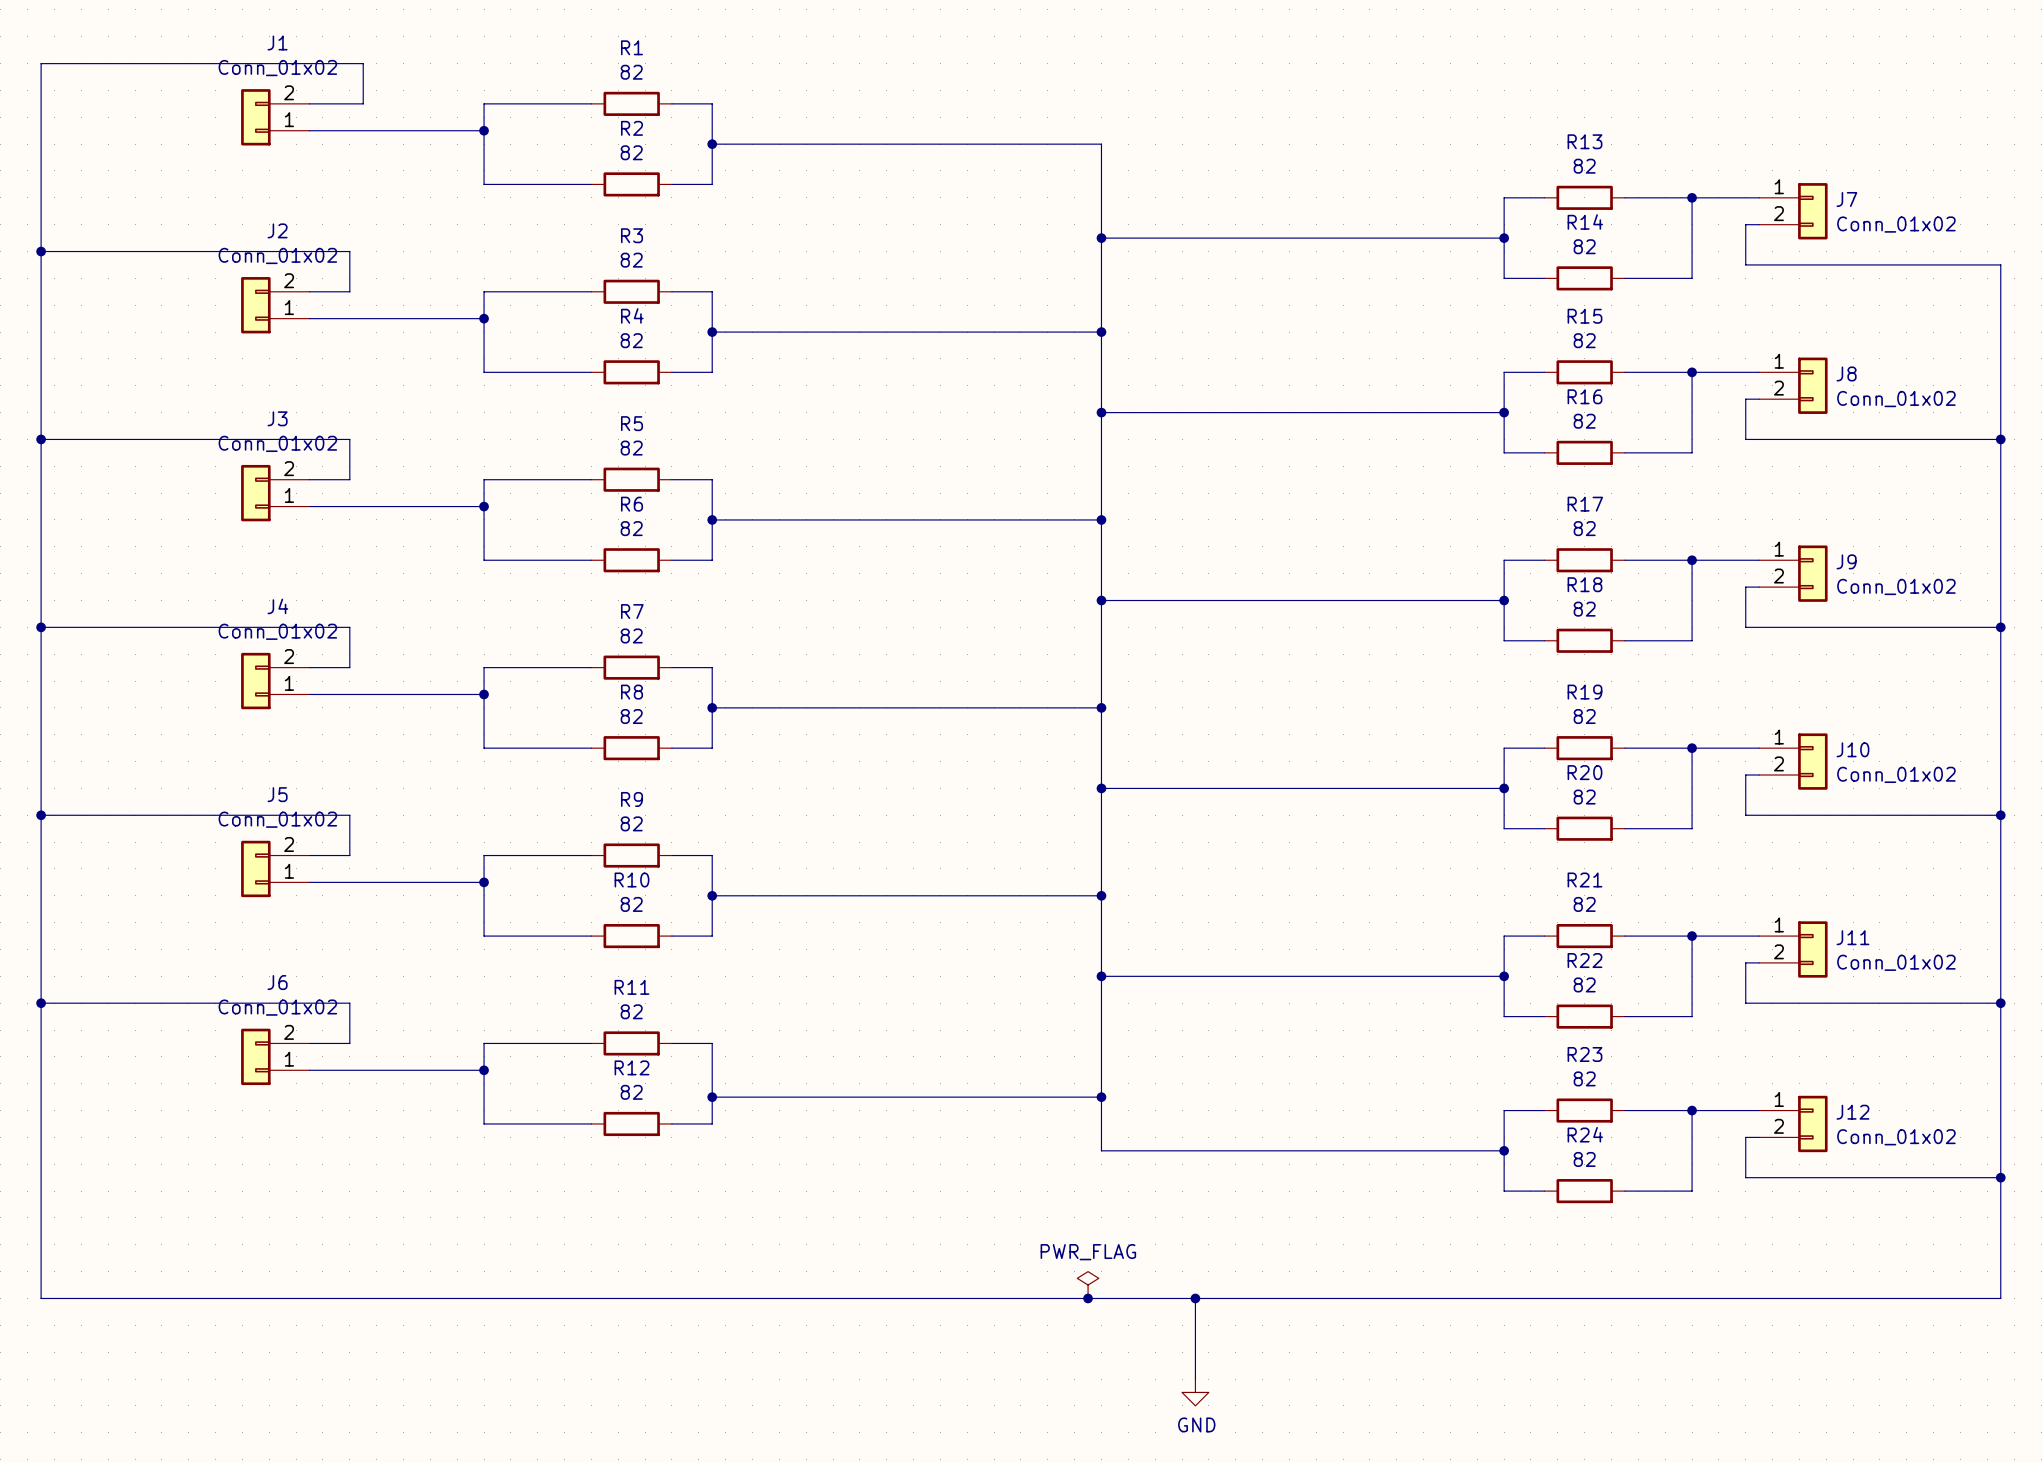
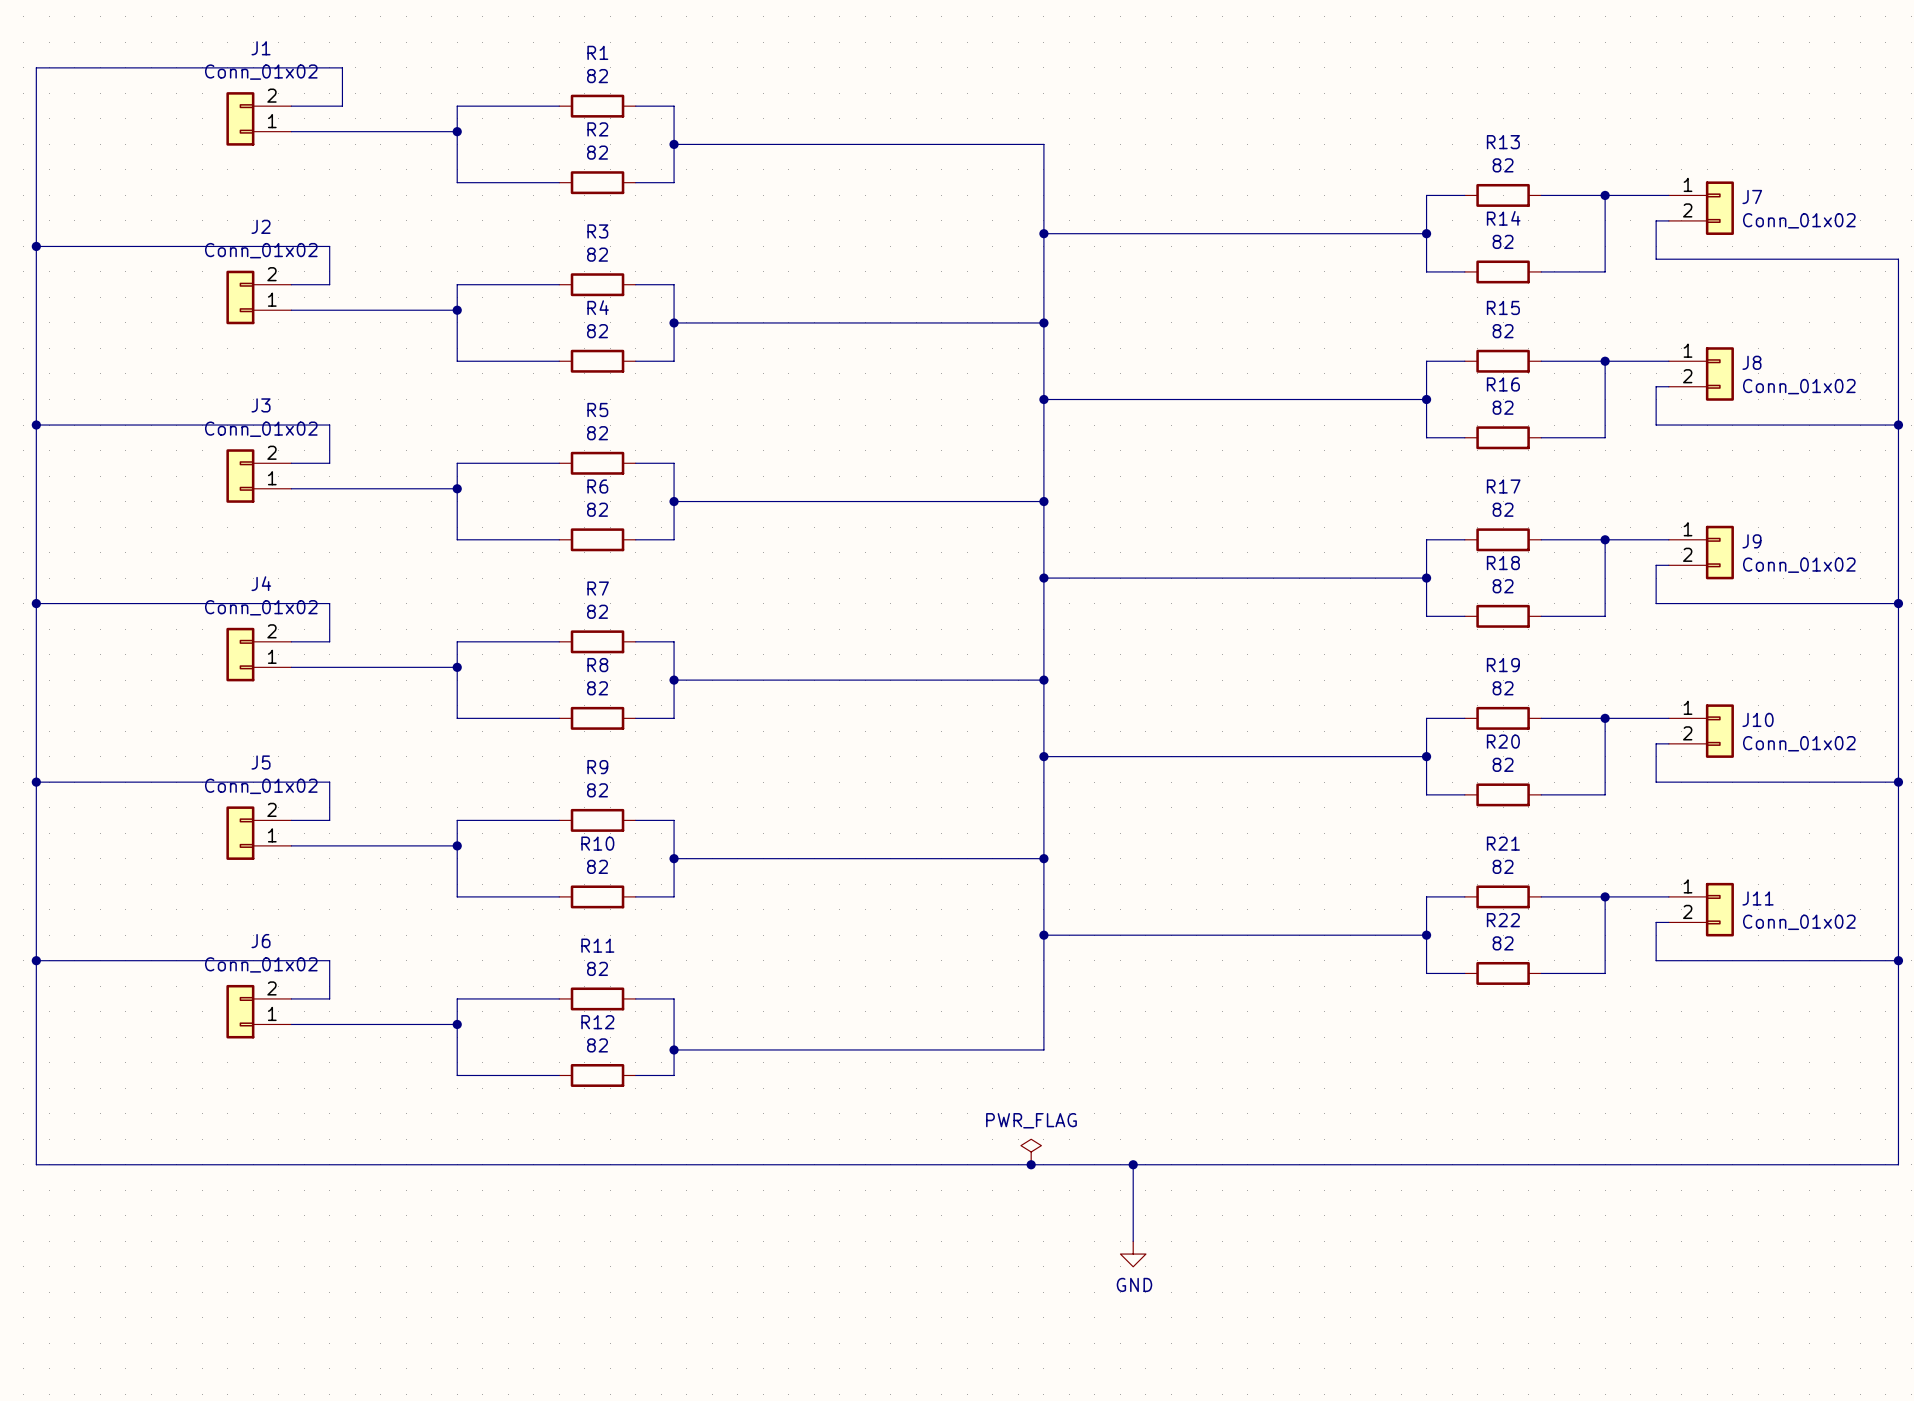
wire: (1101, 1097) (1101, 1150) (1504, 1150) -> none
junction: (1101, 1097) -> none
wire: (1544, 1110) (1504, 1110) (1504, 1191) (1544, 1191) -> none
R23: 82 (1584, 1110) -> none
wire: (1624, 1110) (1759, 1110) -> none
wire: (1692, 1110) (1692, 1191) (1624, 1191) -> none
junction: (1692, 1110) -> none
J12: Conn_01x02 (1793, 1123) -> none
wire: (1759, 1137) (1745, 1137) (1745, 1177) (2000, 1177) -> none
junction: (1504, 1150) -> none
junction: (2000, 1177) -> none
R24: 82 (1584, 1191) -> none
wire: (41, 1217) (41, 1298) (2000, 1298) (2000, 1217) -> (36, 1164) (1898, 1164)
junction: none -> (1031, 1164)
junction: none -> (1133, 1164)
power symbol position: PWR_FLAG (1088, 1285) -> PWR_FLAG (1031, 1152)
junction: (1088, 1298) -> none
wire: (1195, 1298) (1195, 1379) -> (1133, 1241) (1133, 1164)
junction: (1195, 1298) -> none
power symbol position: GND (1195, 1392) -> GND (1133, 1254)

